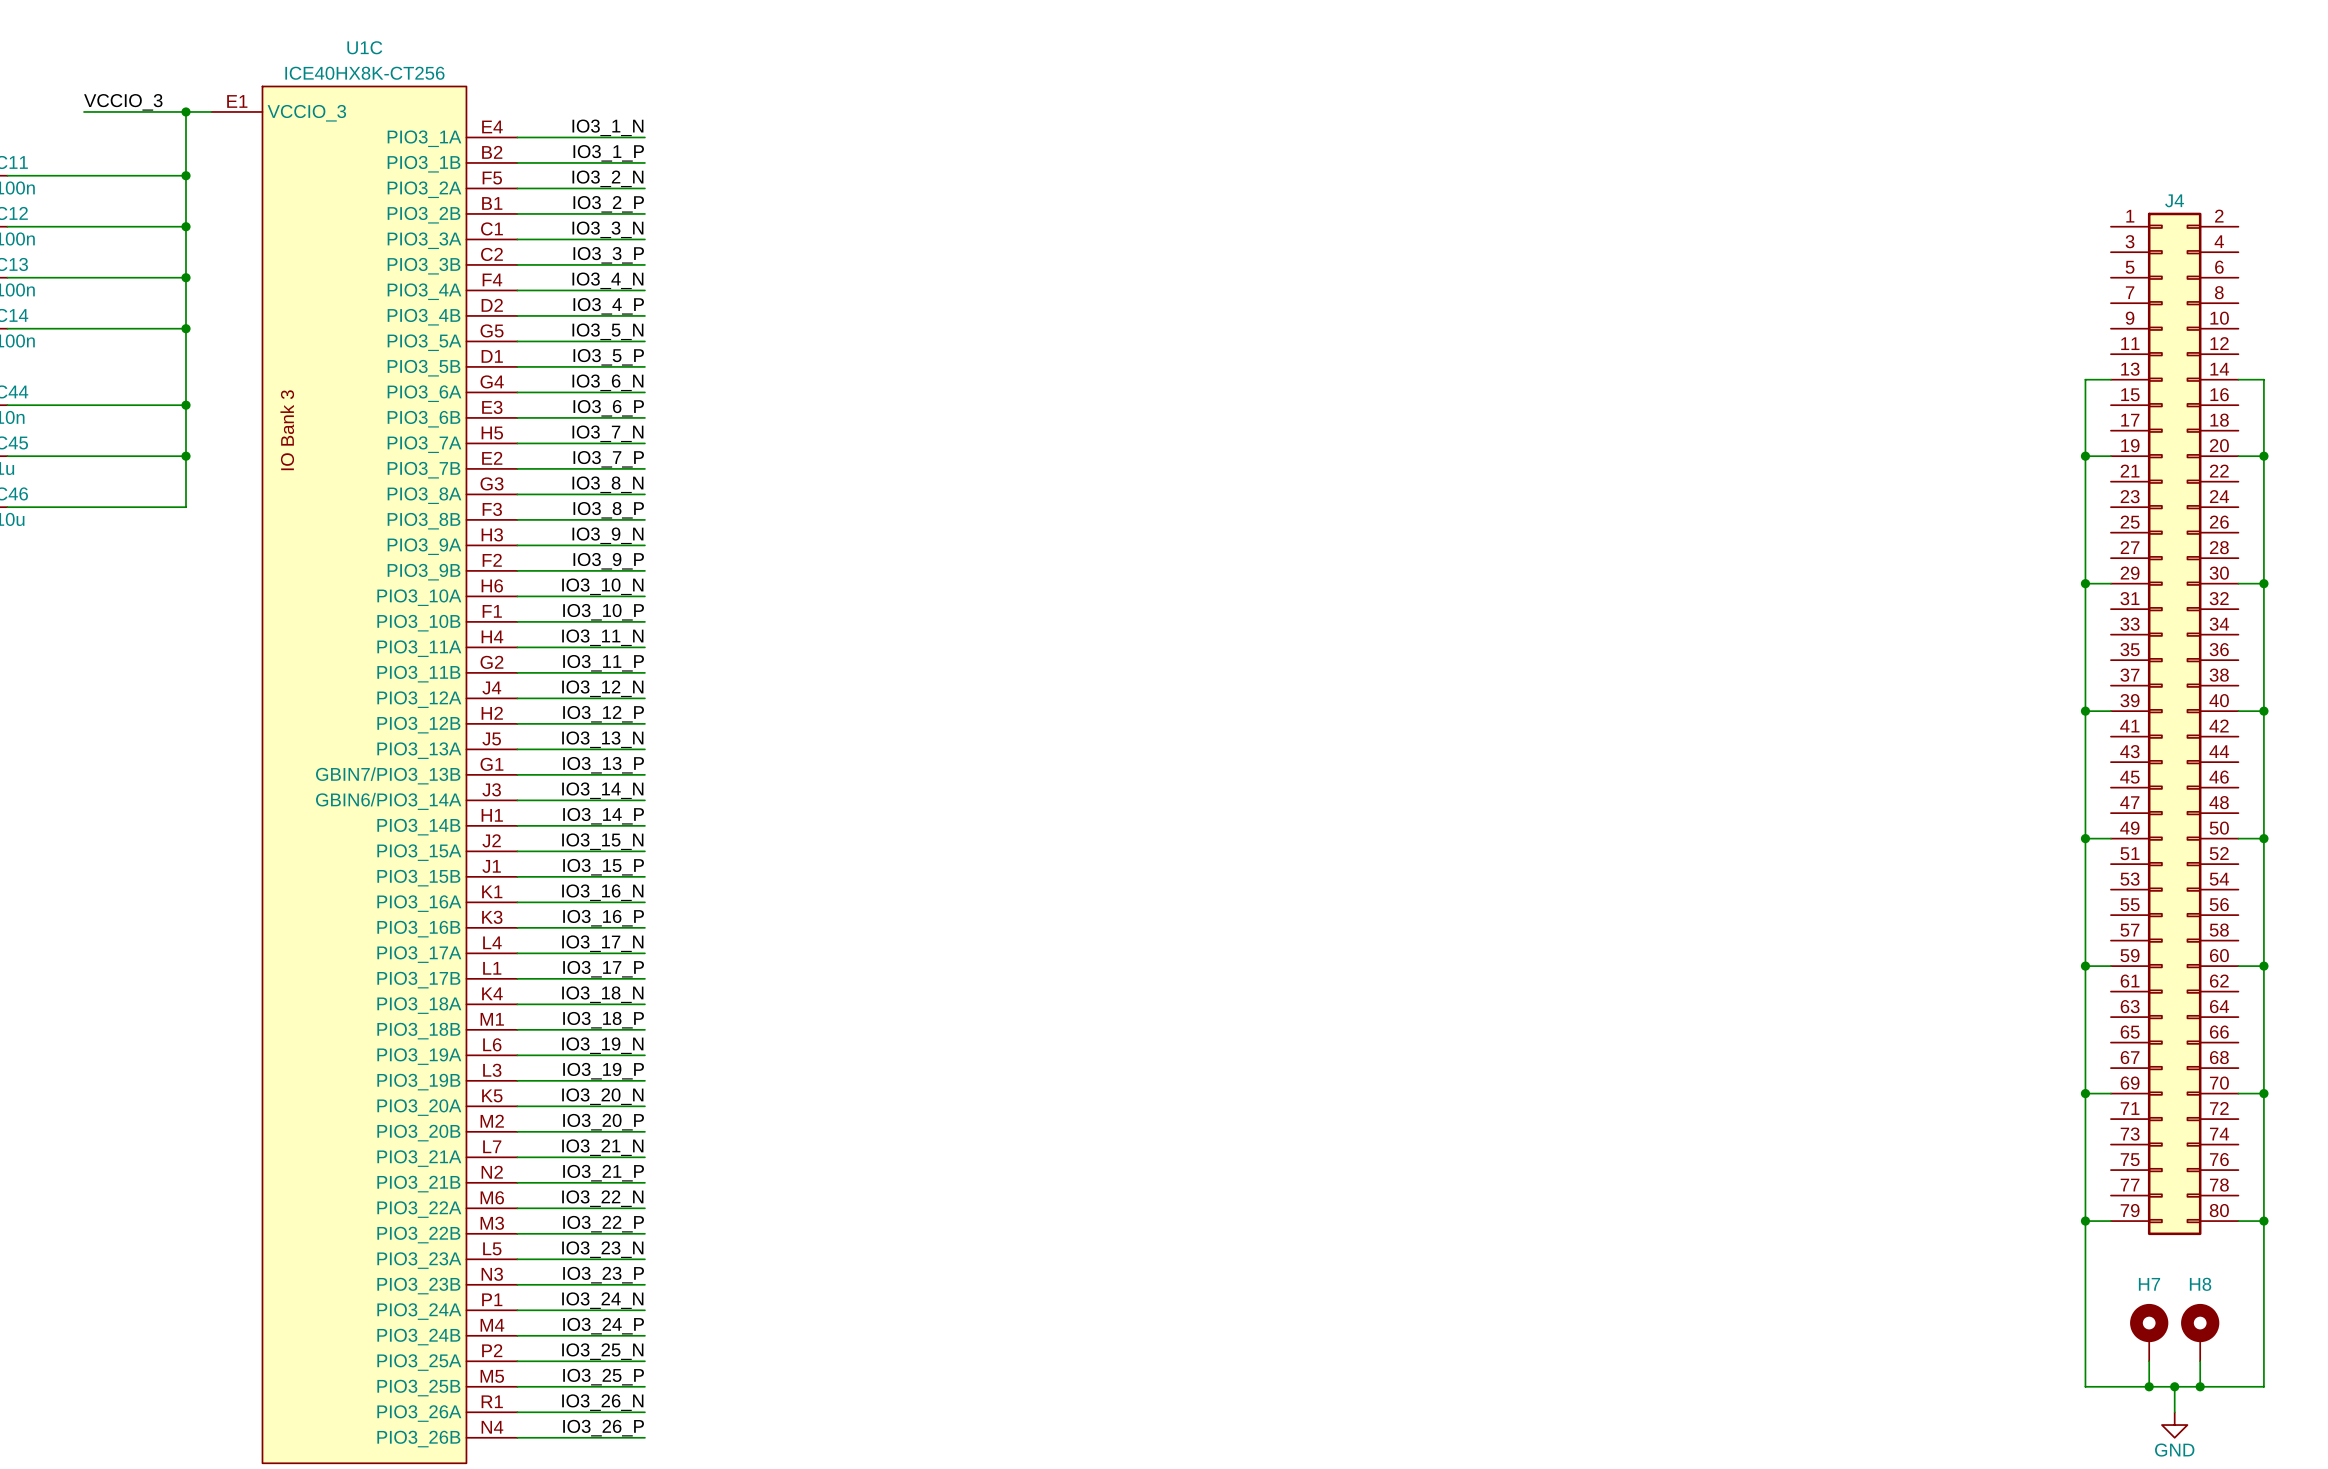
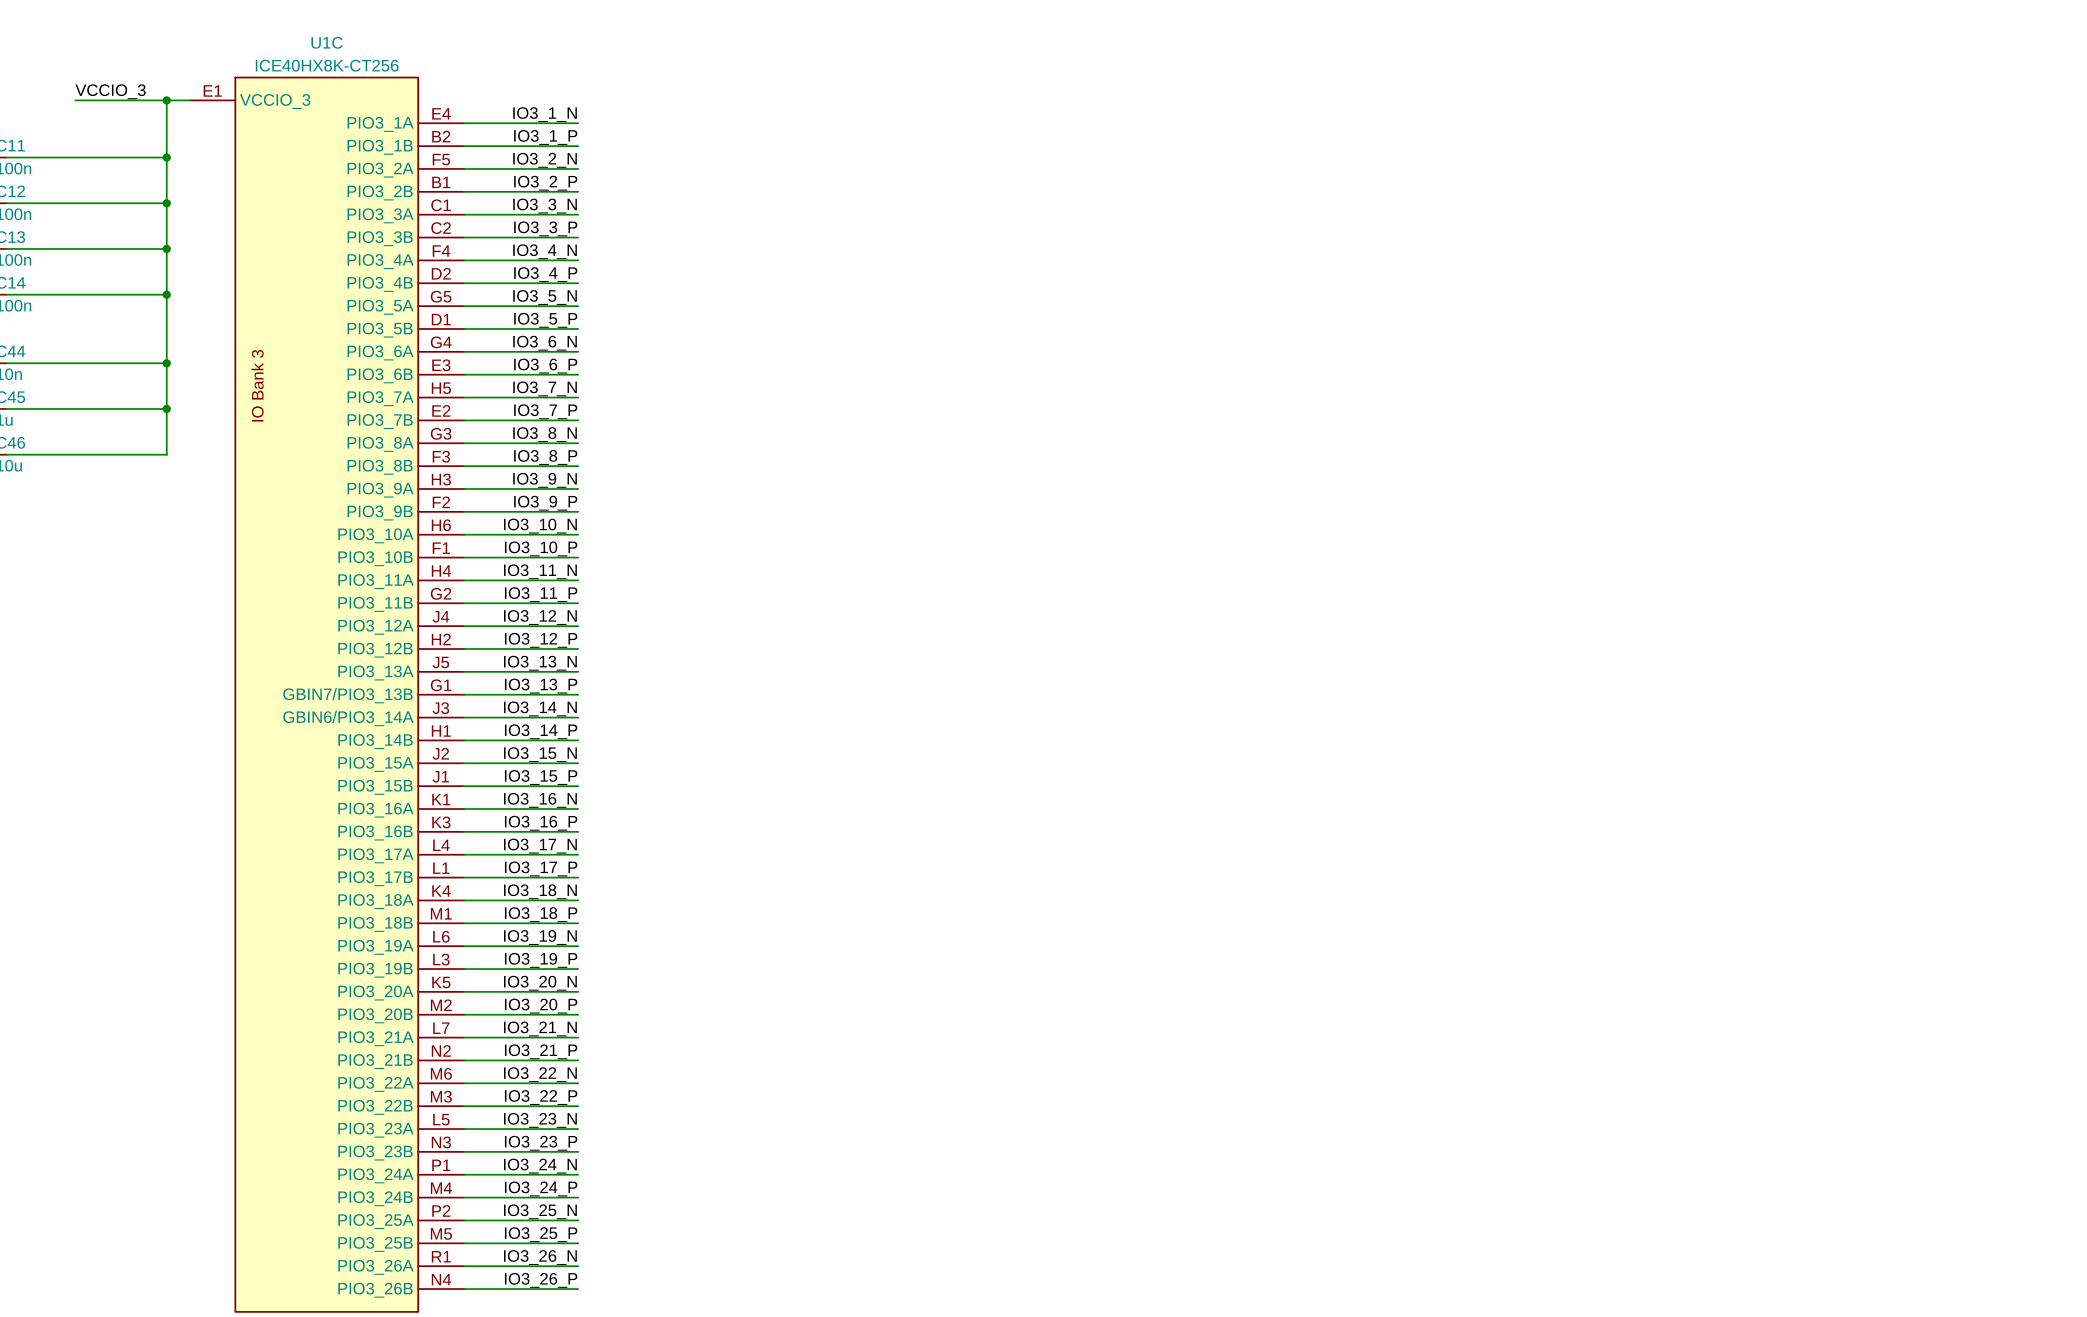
wire: (2110, 379) (2085, 379) (2085, 1386) (2263, 1386) (2263, 379) (2238, 379) -> none
wire: (2085, 456) (2110, 456) -> none
junction: (2085, 456) -> none
wire: (2238, 456) (2263, 456) -> none
junction: (2263, 456) -> none
wire: (2085, 583) (2110, 583) -> none
junction: (2085, 583) -> none
wire: (2238, 583) (2263, 583) -> none
junction: (2263, 583) -> none
wire: (2085, 711) (2110, 711) -> none
junction: (2085, 711) -> none
wire: (2238, 711) (2263, 711) -> none
junction: (2263, 711) -> none
J4: (2174, 723) -> none
wire: (2085, 838) (2110, 838) -> none
junction: (2085, 838) -> none
wire: (2238, 838) (2263, 838) -> none
junction: (2263, 838) -> none
wire: (2085, 966) (2110, 966) -> none
junction: (2085, 966) -> none
wire: (2238, 966) (2263, 966) -> none
junction: (2263, 966) -> none
wire: (2085, 1093) (2110, 1093) -> none
junction: (2085, 1093) -> none
wire: (2238, 1093) (2263, 1093) -> none
junction: (2263, 1093) -> none
wire: (2085, 1221) (2110, 1221) -> none
junction: (2085, 1221) -> none
wire: (2238, 1221) (2263, 1221) -> none
junction: (2263, 1221) -> none
H7: (2149, 1332) -> none
H8: (2200, 1332) -> none
wire: (2149, 1361) (2149, 1386) -> none
wire: (2200, 1361) (2200, 1386) -> none
junction: (2149, 1386) -> none
wire: (2174, 1386) (2174, 1412) -> none
junction: (2174, 1386) -> none
junction: (2200, 1386) -> none
power symbol: GND (2174, 1425) -> none

